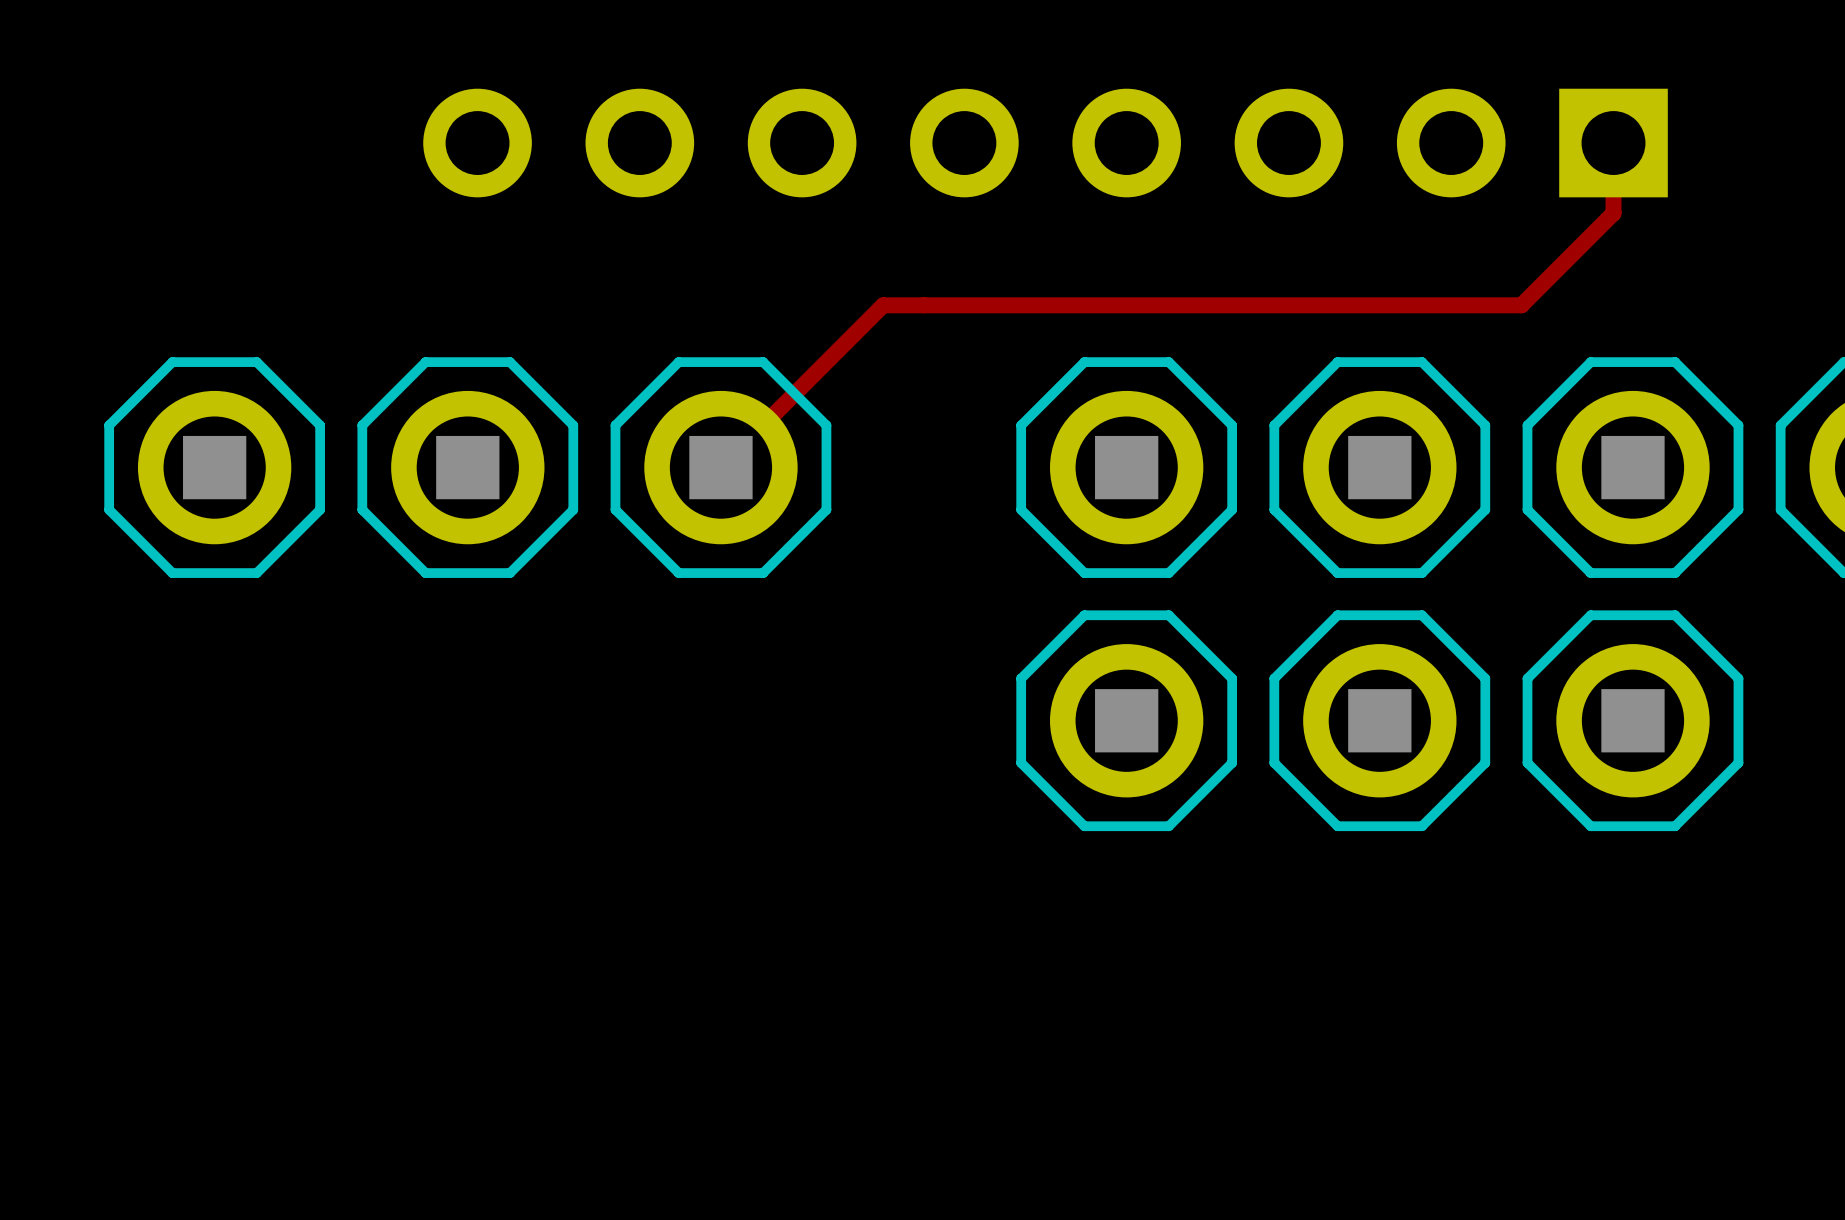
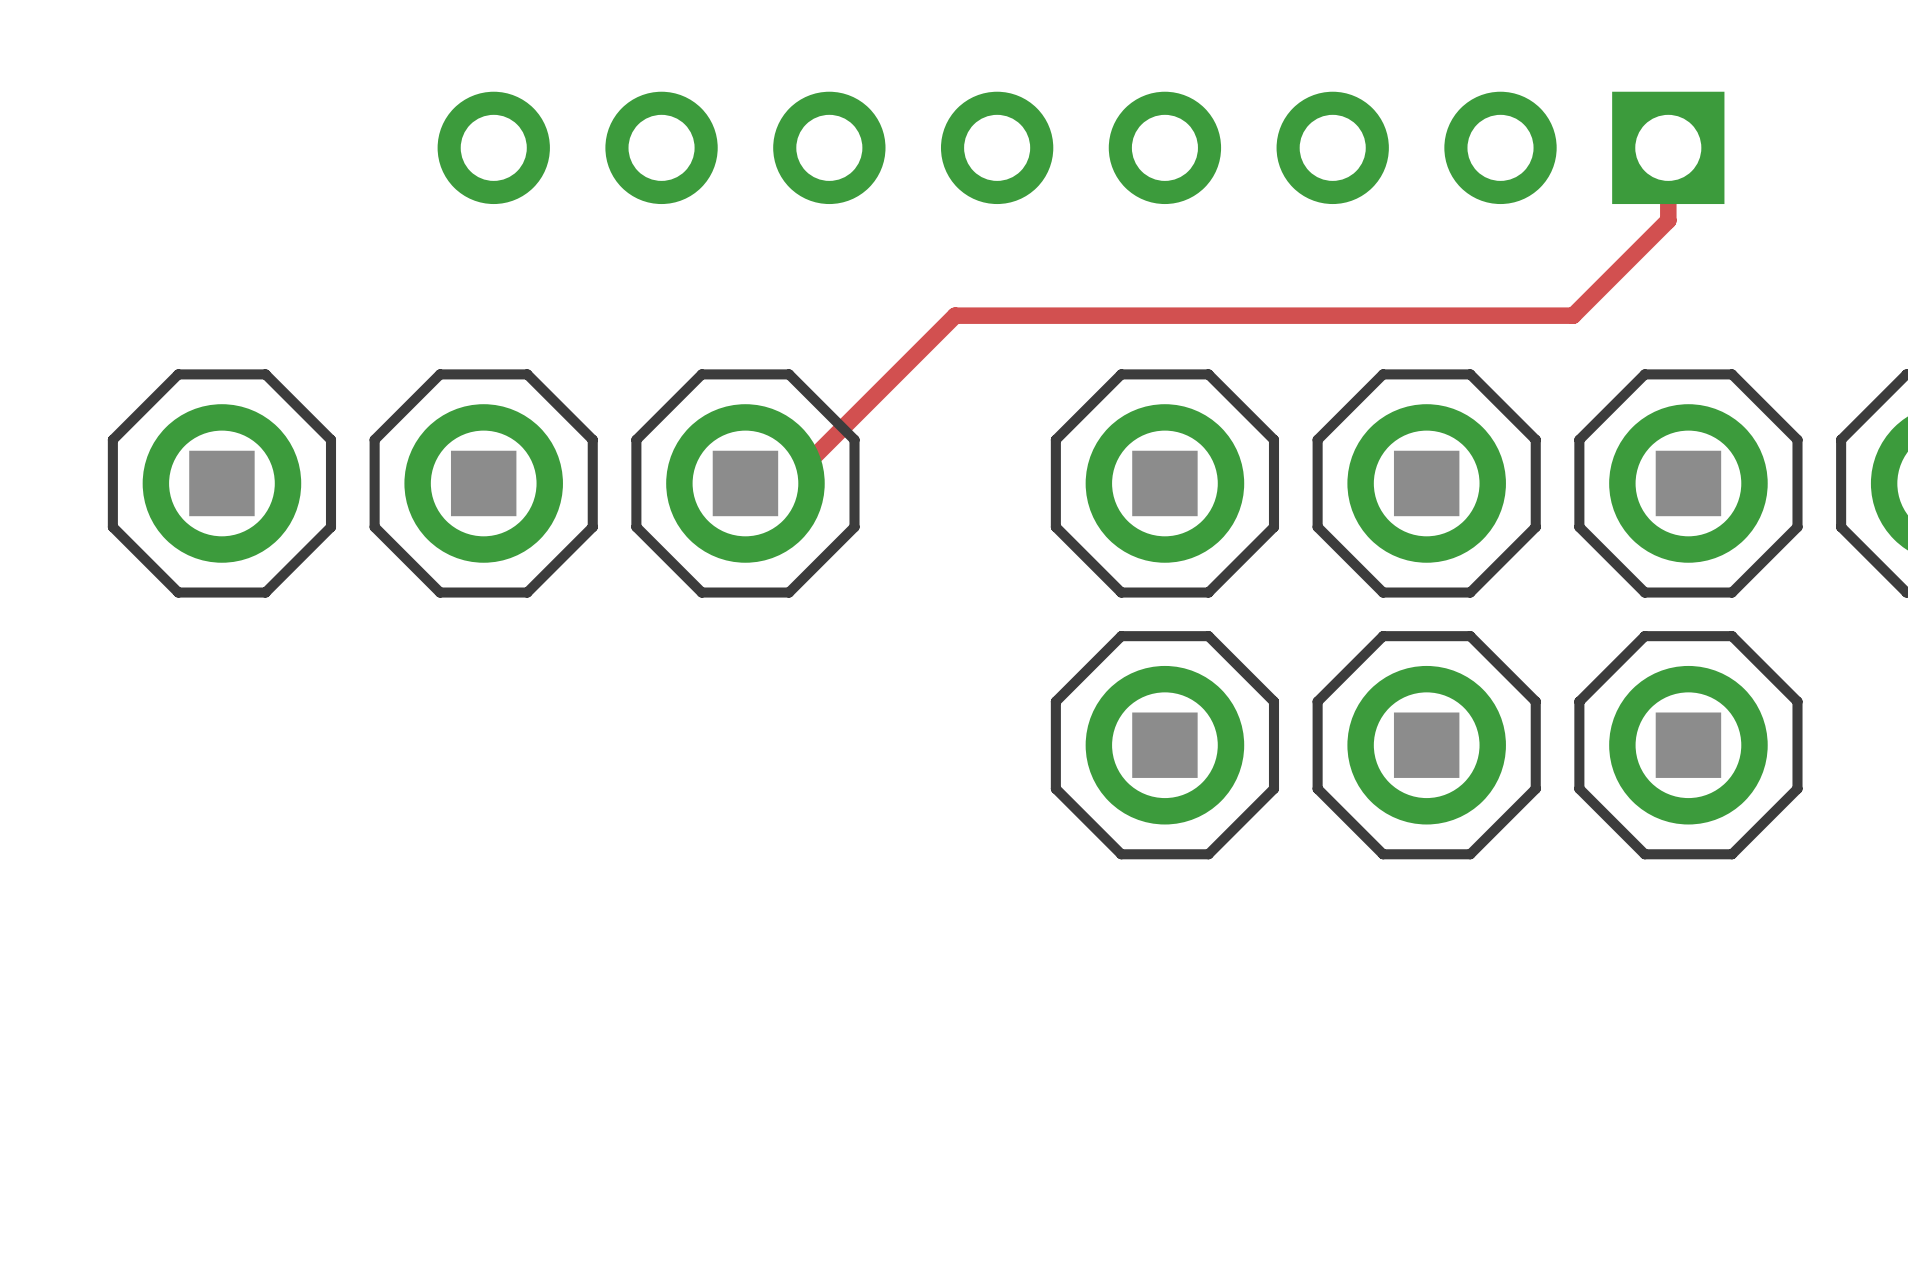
track: (923, 305) (883, 305) (720, 467) -> (955, 315) (787, 483)

